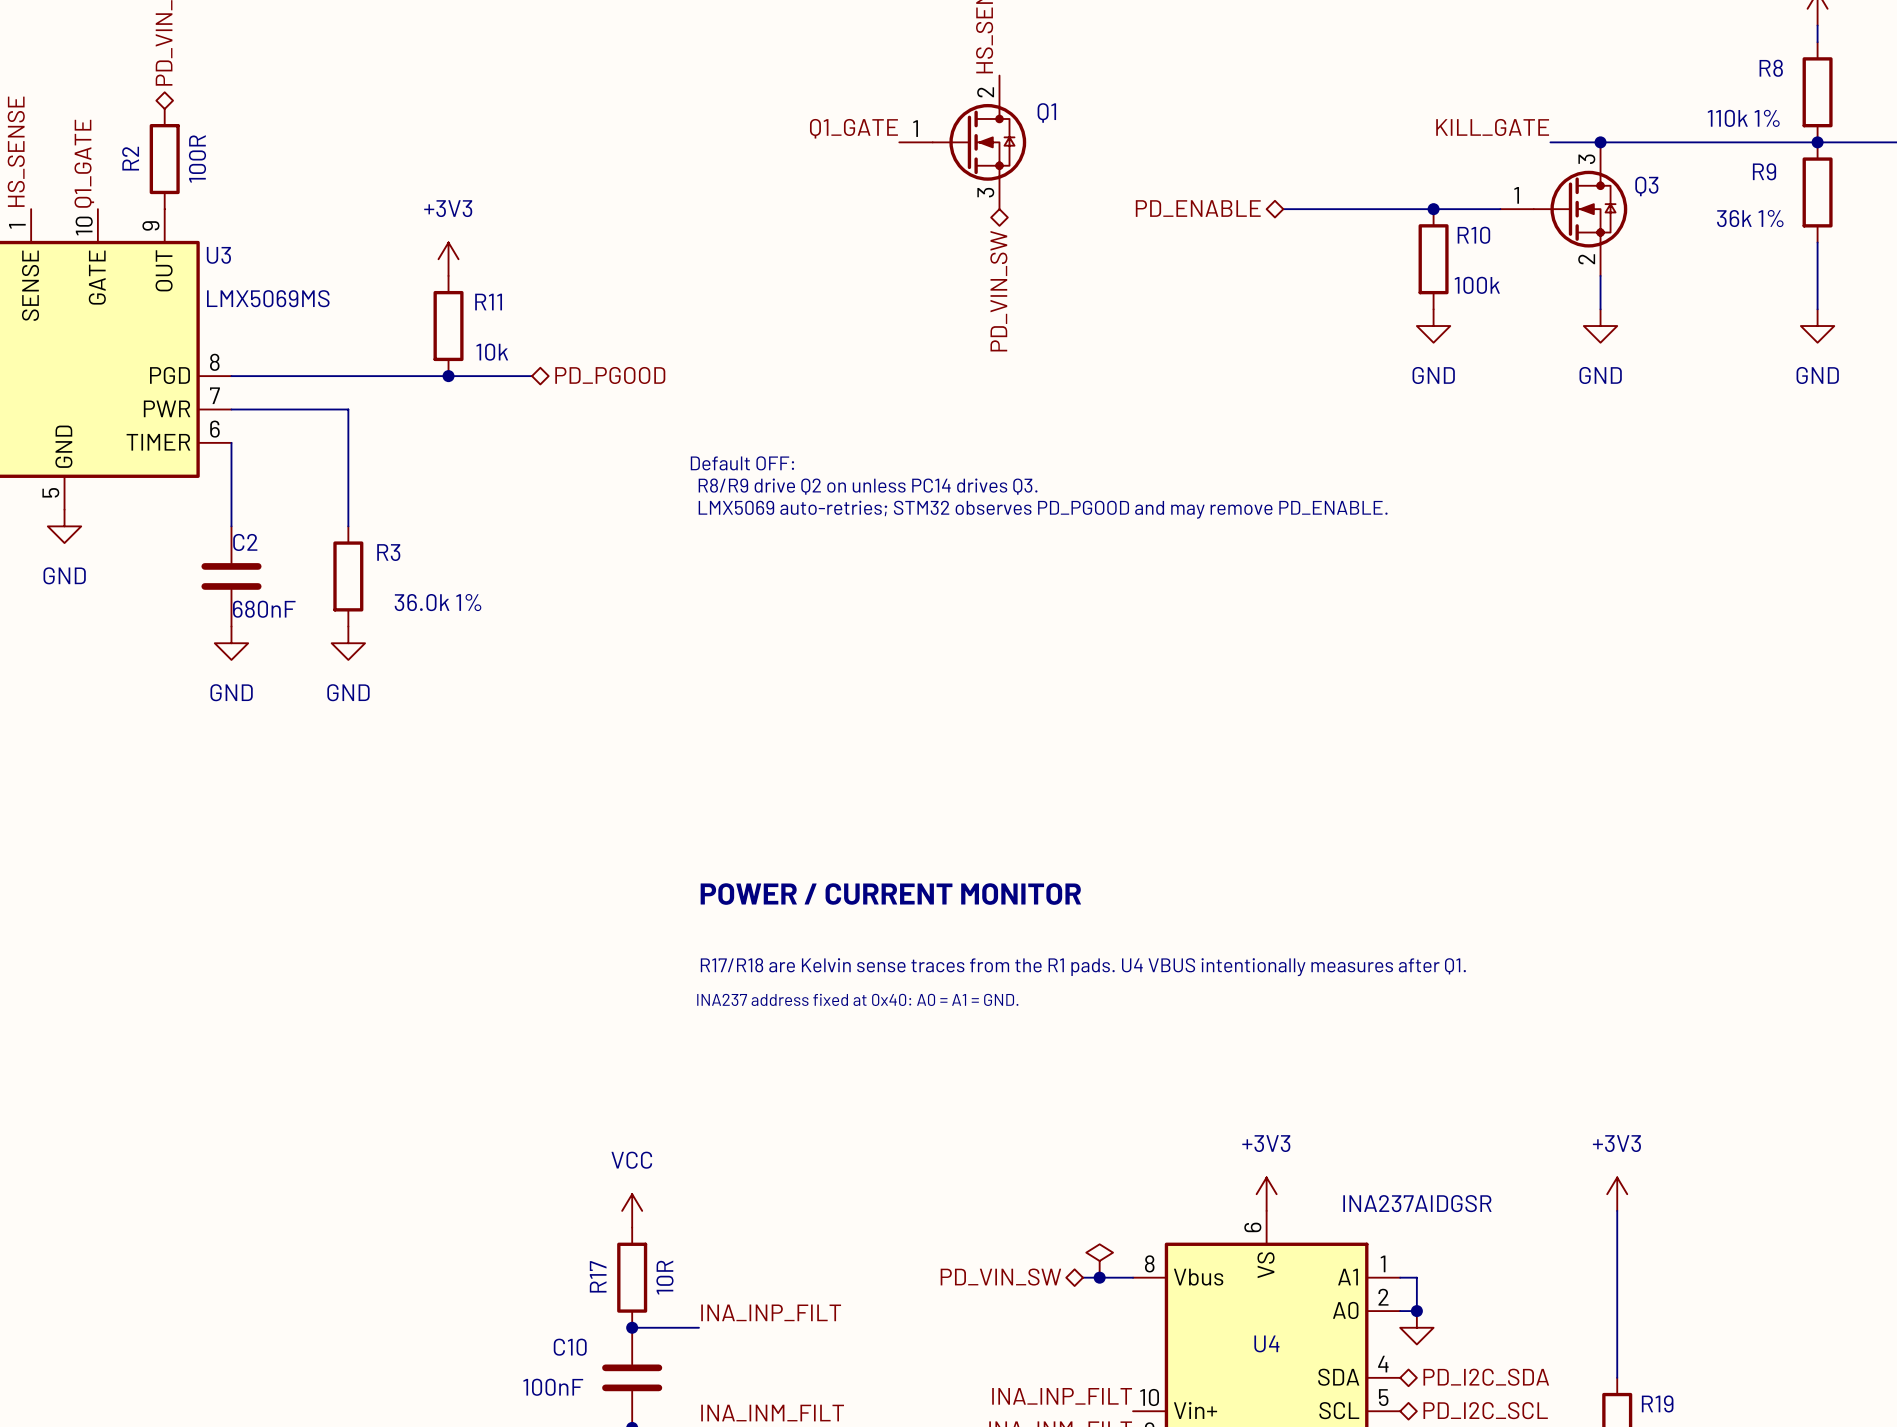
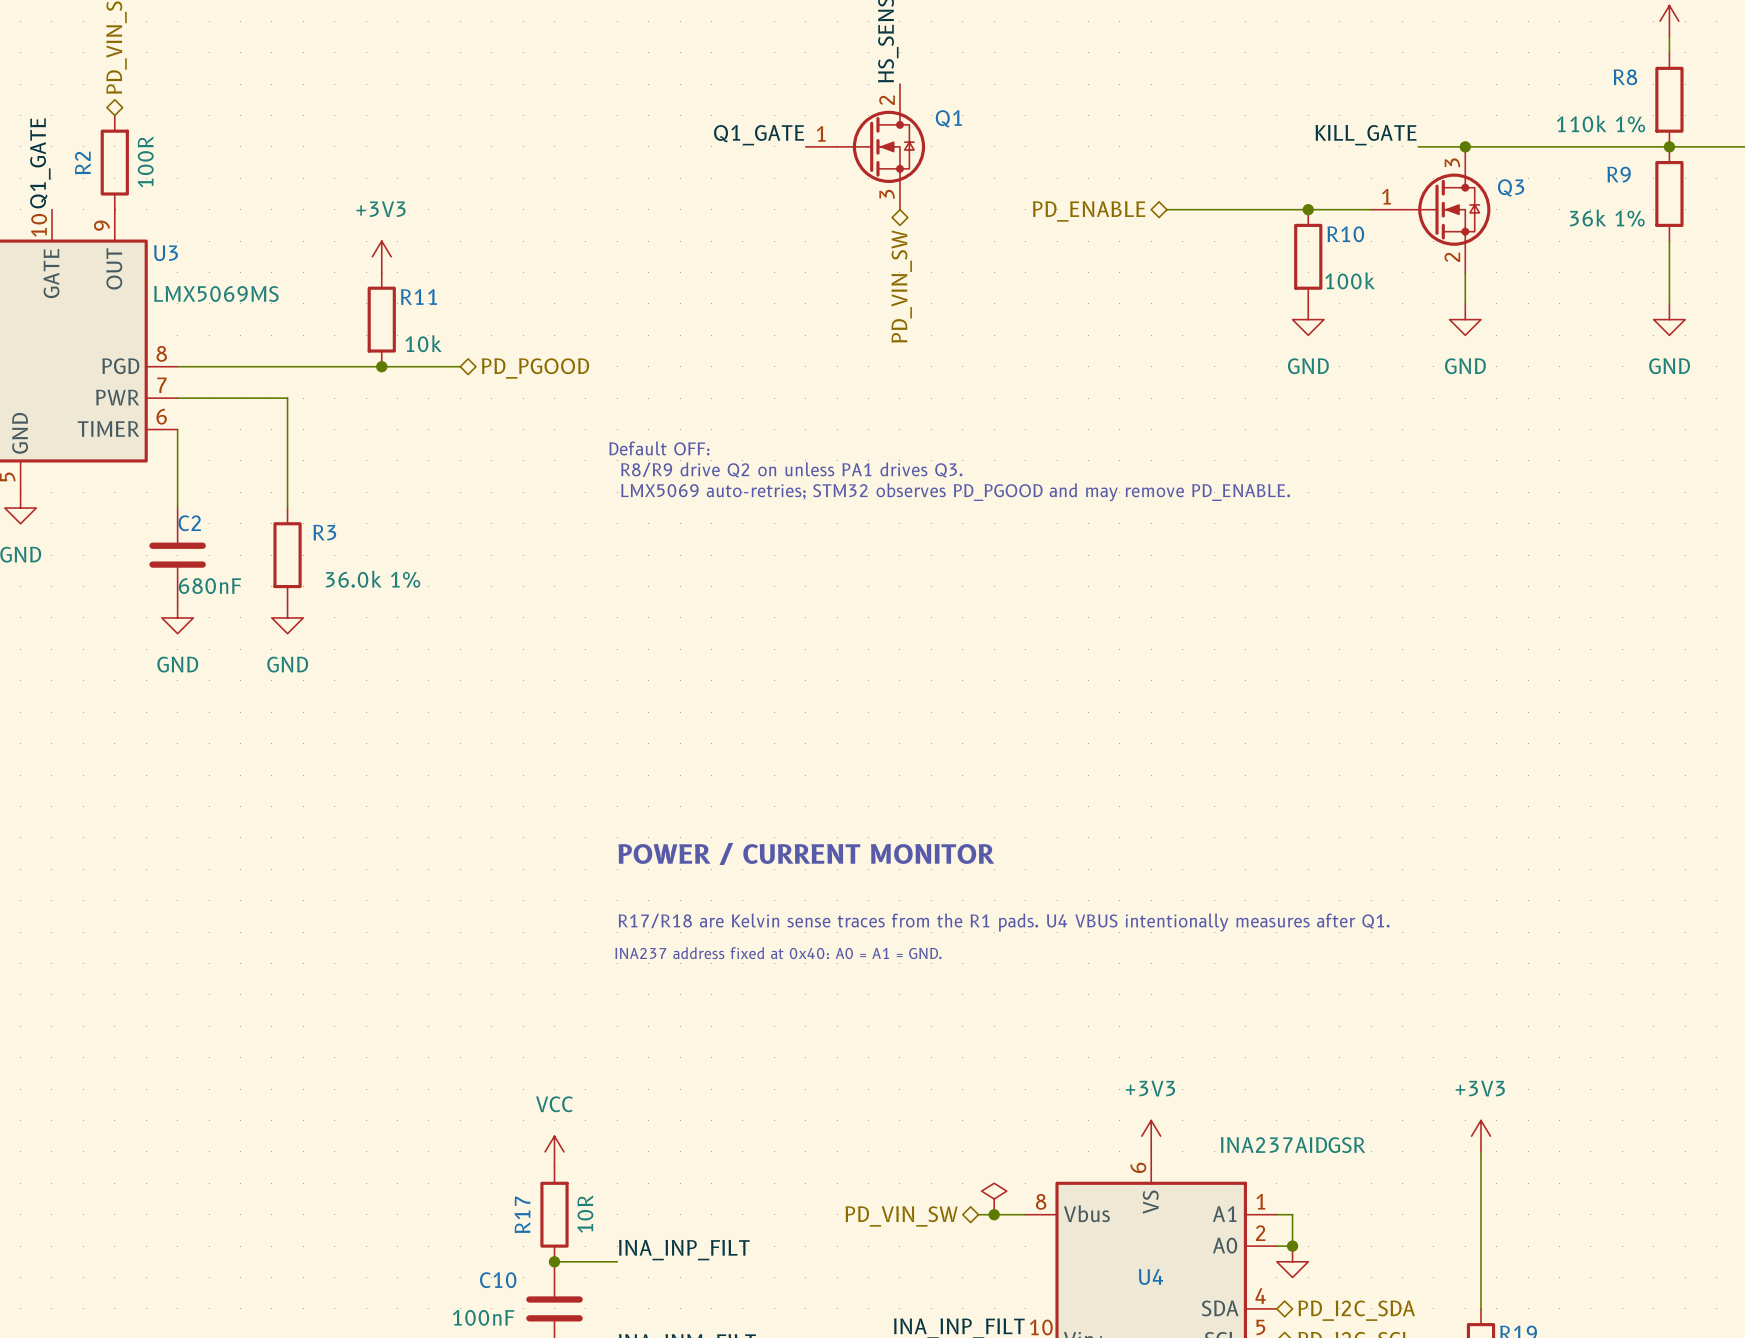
text: R8/R9 drive Q2 on unless PC14 drives Q3. (868, 486) -> R8/R9 drive Q2 on unless PA1 drives Q3. (791, 469)

